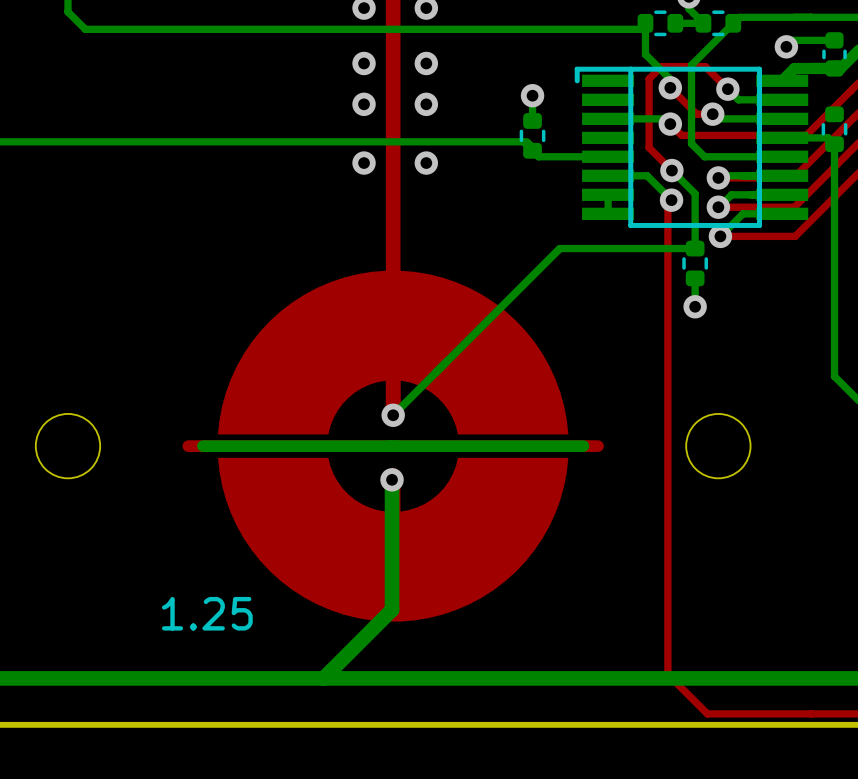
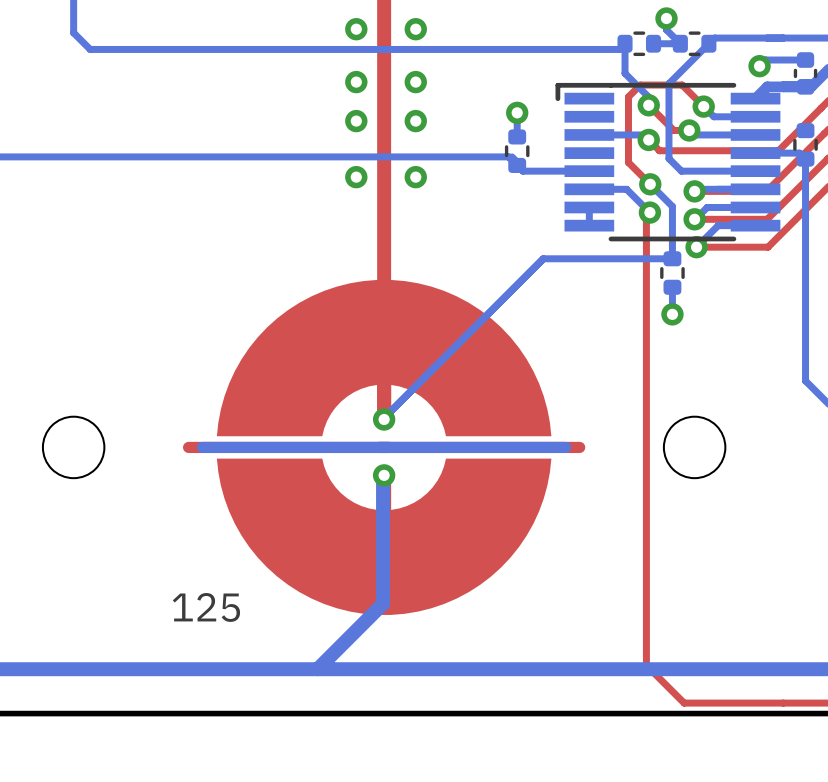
part footprint: [574, 66, 809, 228] -> [555, 82, 781, 242]
part footprint: [182, 270, 604, 622] -> [182, 279, 586, 615]
via: (393, 415) -> none
via: (392, 479) -> none
text: 1.25 (207, 613) -> 125 (206, 607)

